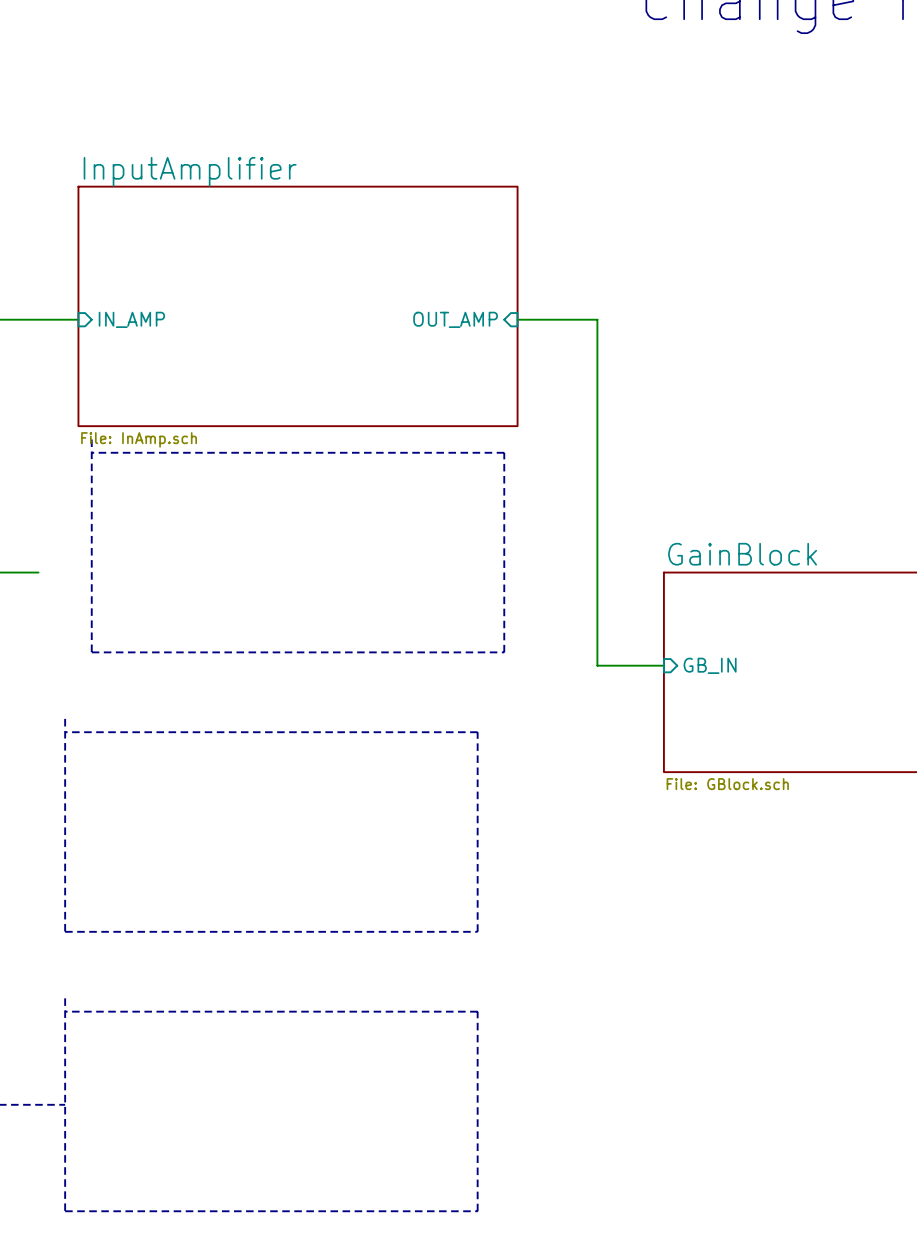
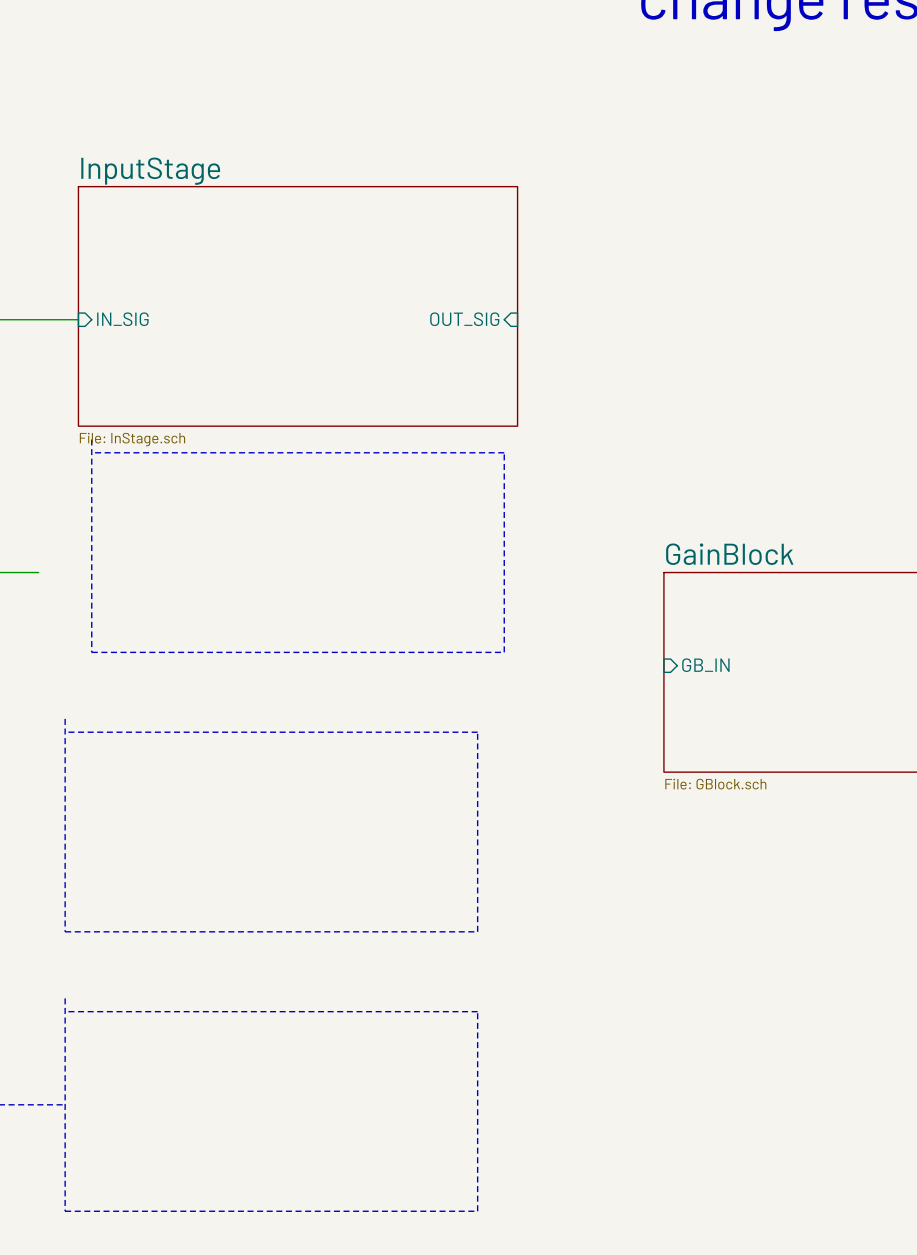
sheet InputAmplifier name: InputAmplifier (190, 171) -> InputStage (150, 171)
sheet pin: IN_AMP (131, 319) -> IN_SIG (122, 319)
sheet pin: OUT_AMP (455, 319) -> OUT_SIG (464, 319)
wire: (517, 319) (597, 319) (597, 665) (663, 665) -> none
sheet InputAmplifier value: File: InAmp.sch (139, 439) -> File: InStage.sch (132, 439)

